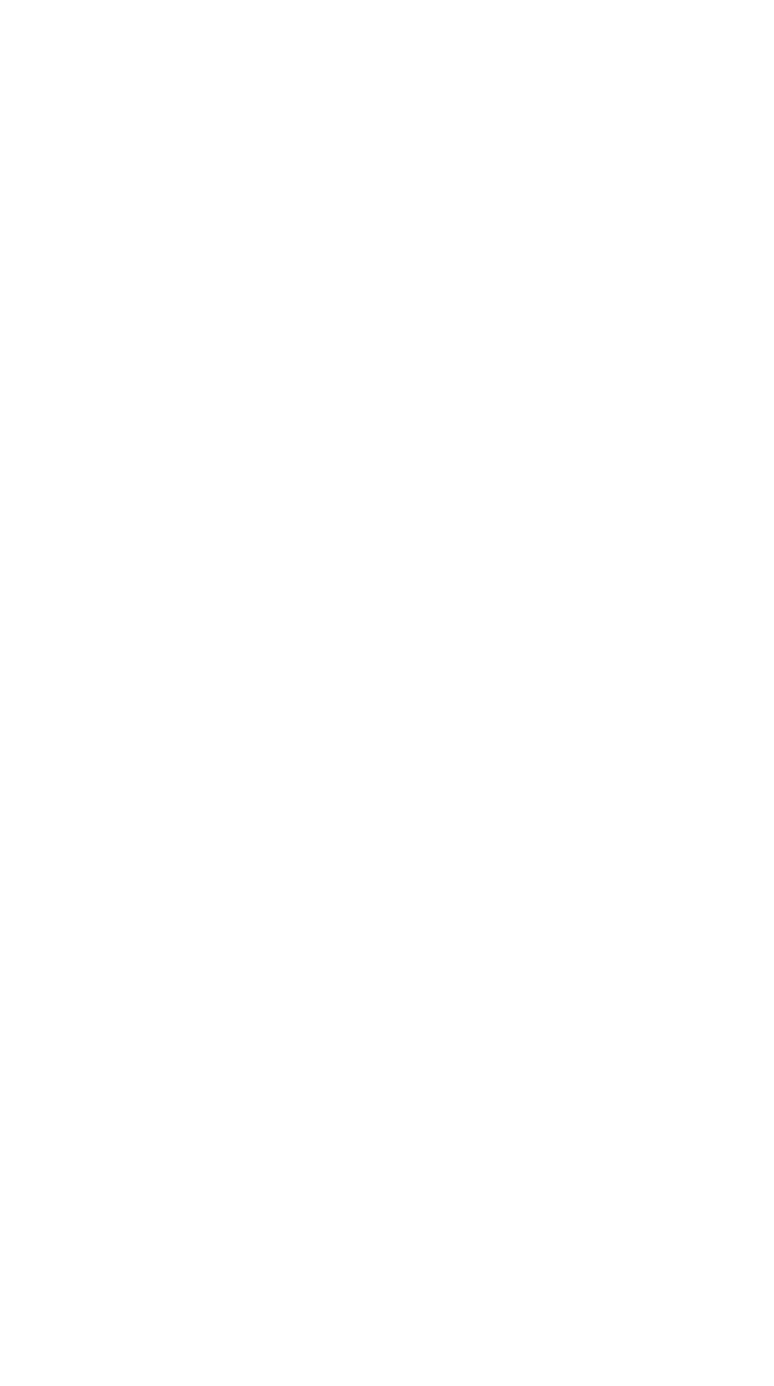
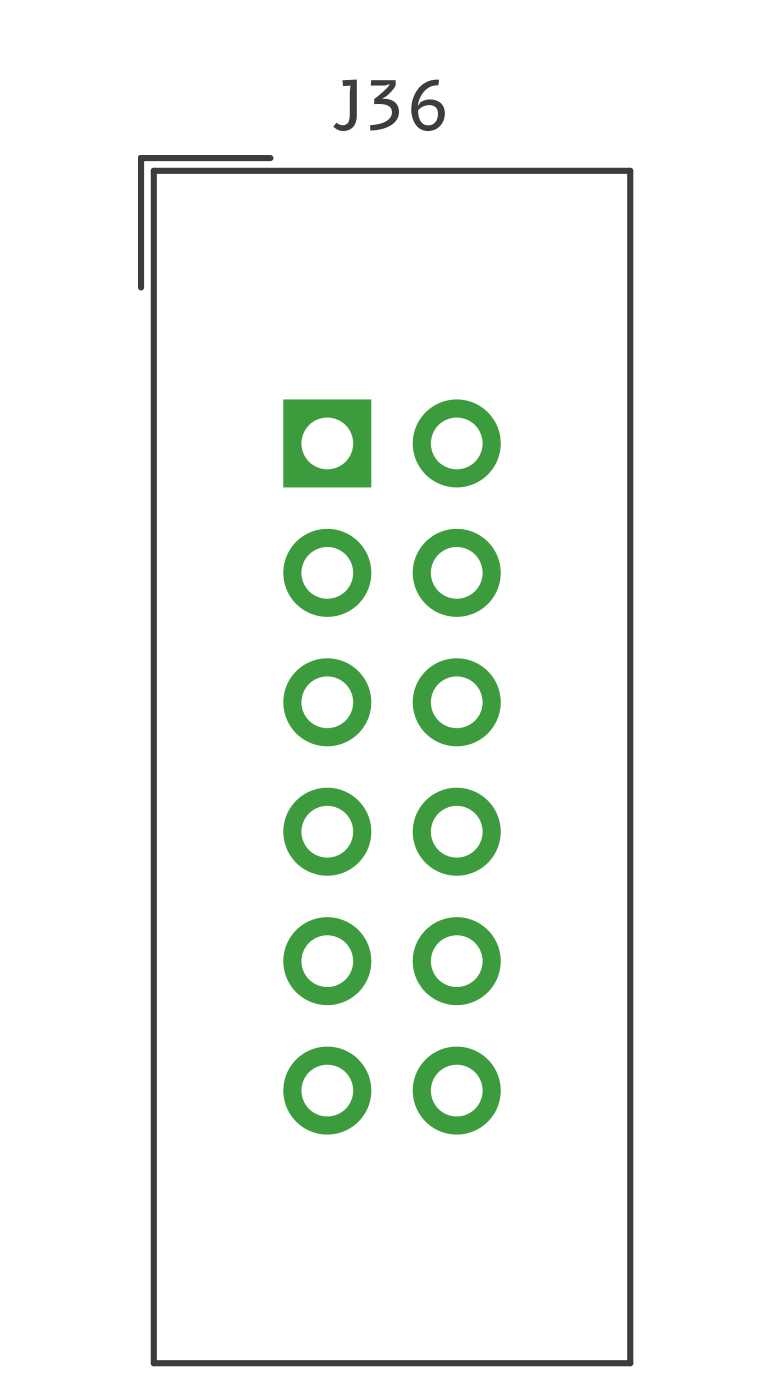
J36: none -> (385, 760)

